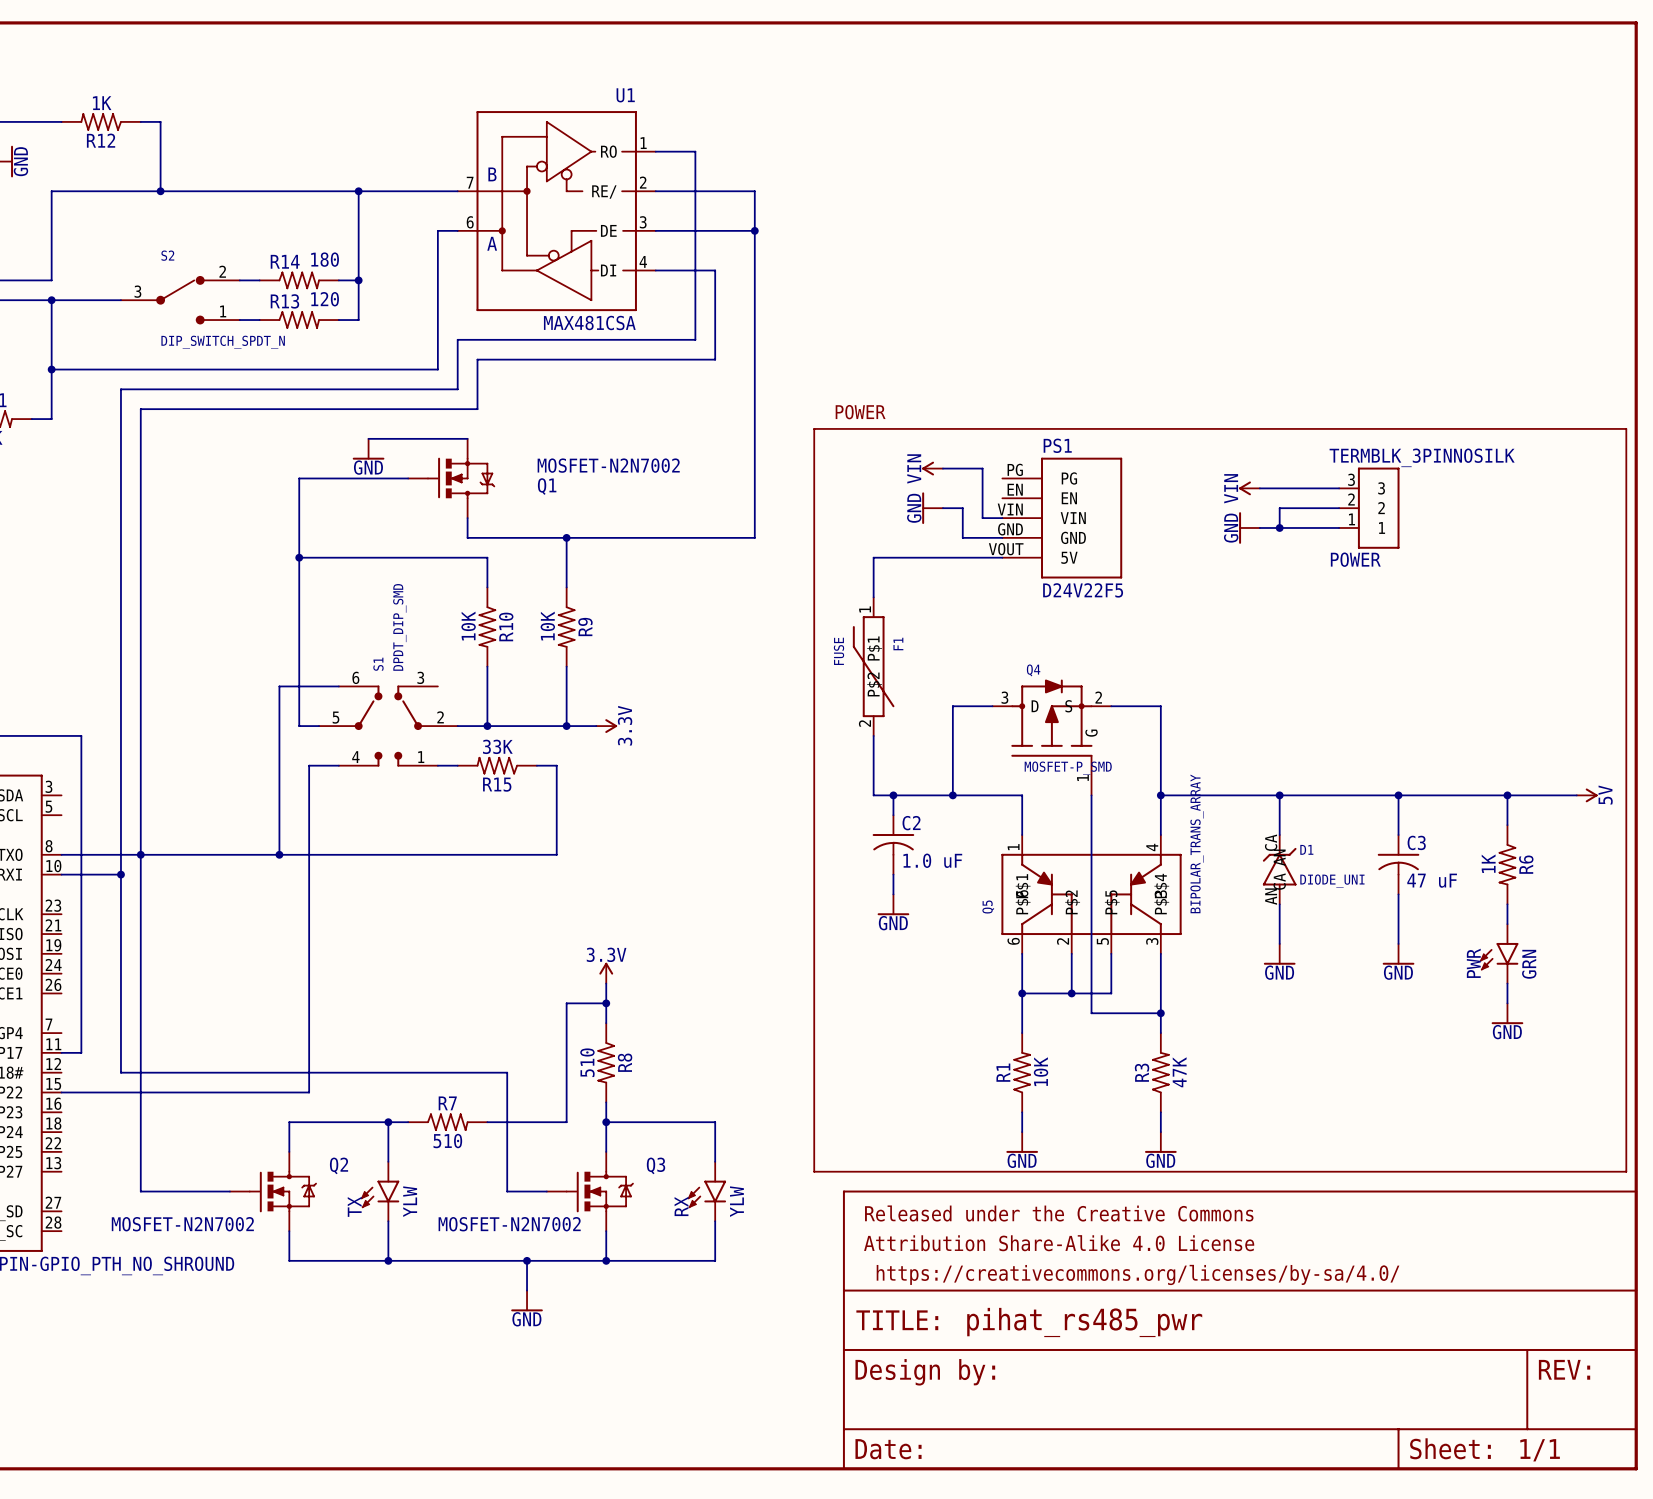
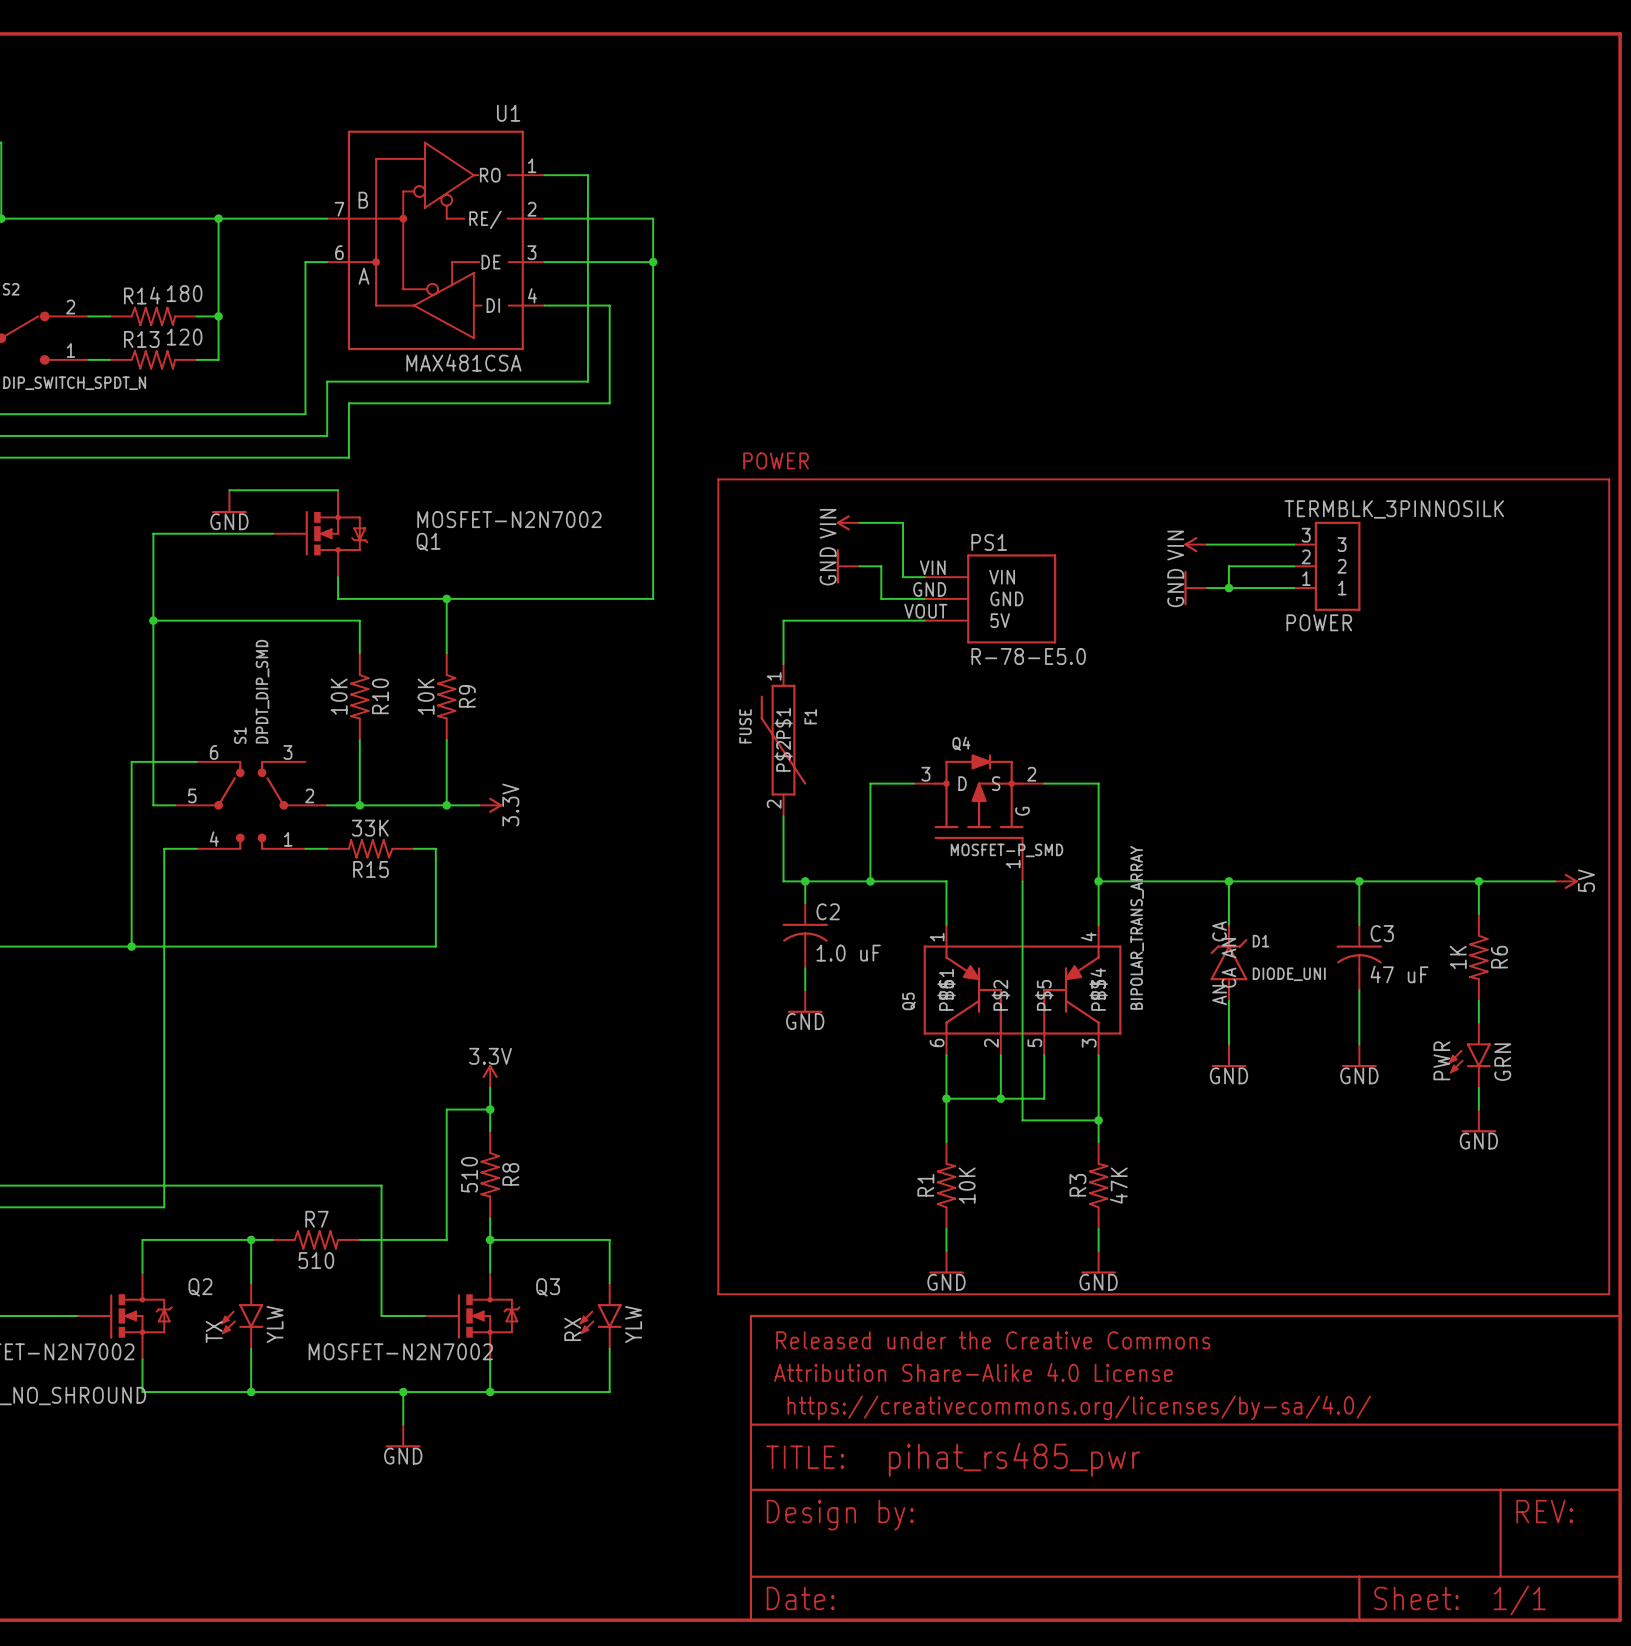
PS1 name position: PS1 (1057, 445) -> PS1 (989, 542)
PS1 symbol: [1002, 457, 1123, 579] -> [924, 554, 1057, 644]
PS1 value: D24V22F5 (1083, 590) -> R-78-E5.0 (1028, 656)

